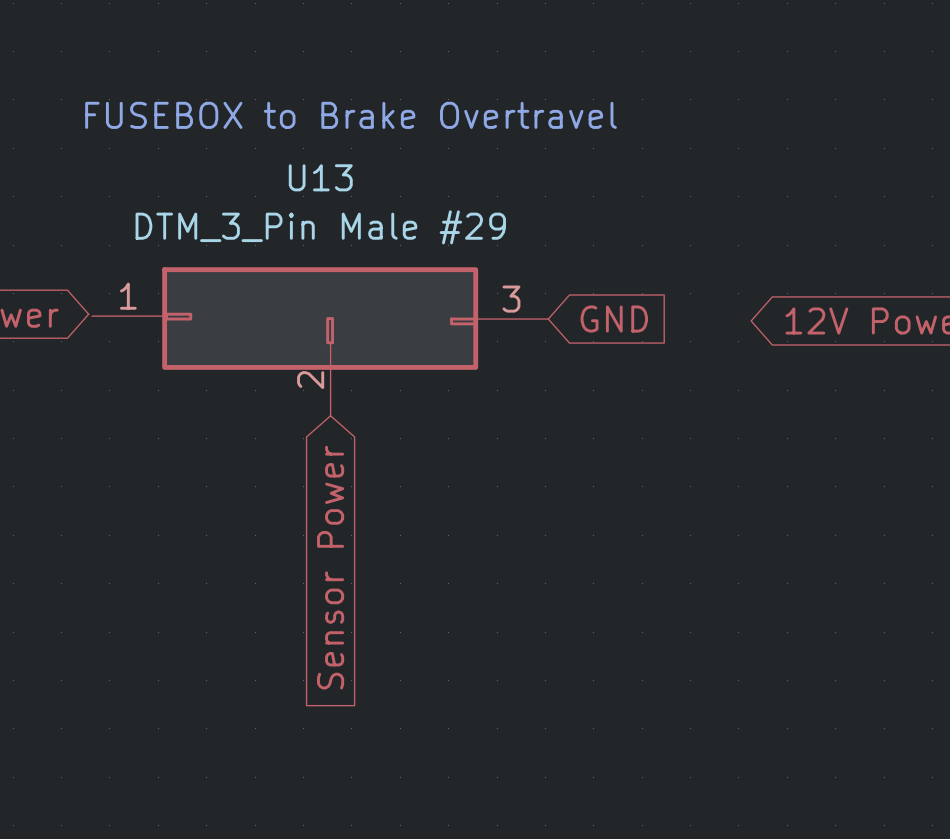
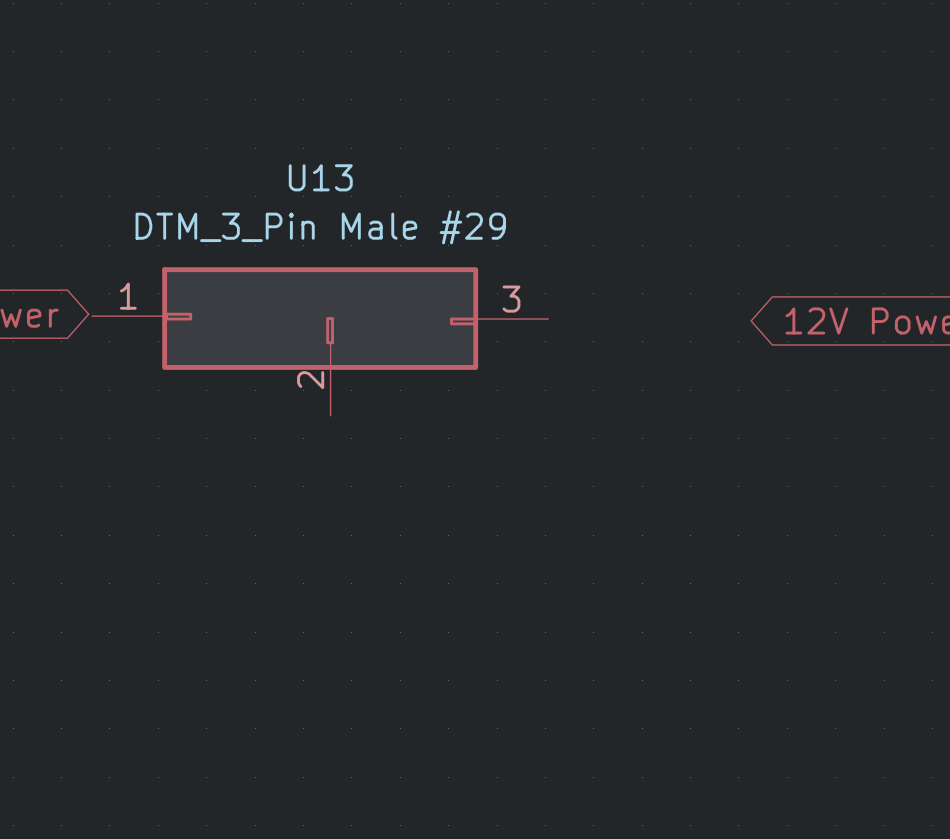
text: FUSEBOX to Brake Overtravel (351, 115) -> none
global label: GND (614, 319) -> none
global label: Sensor Power (330, 567) -> none

